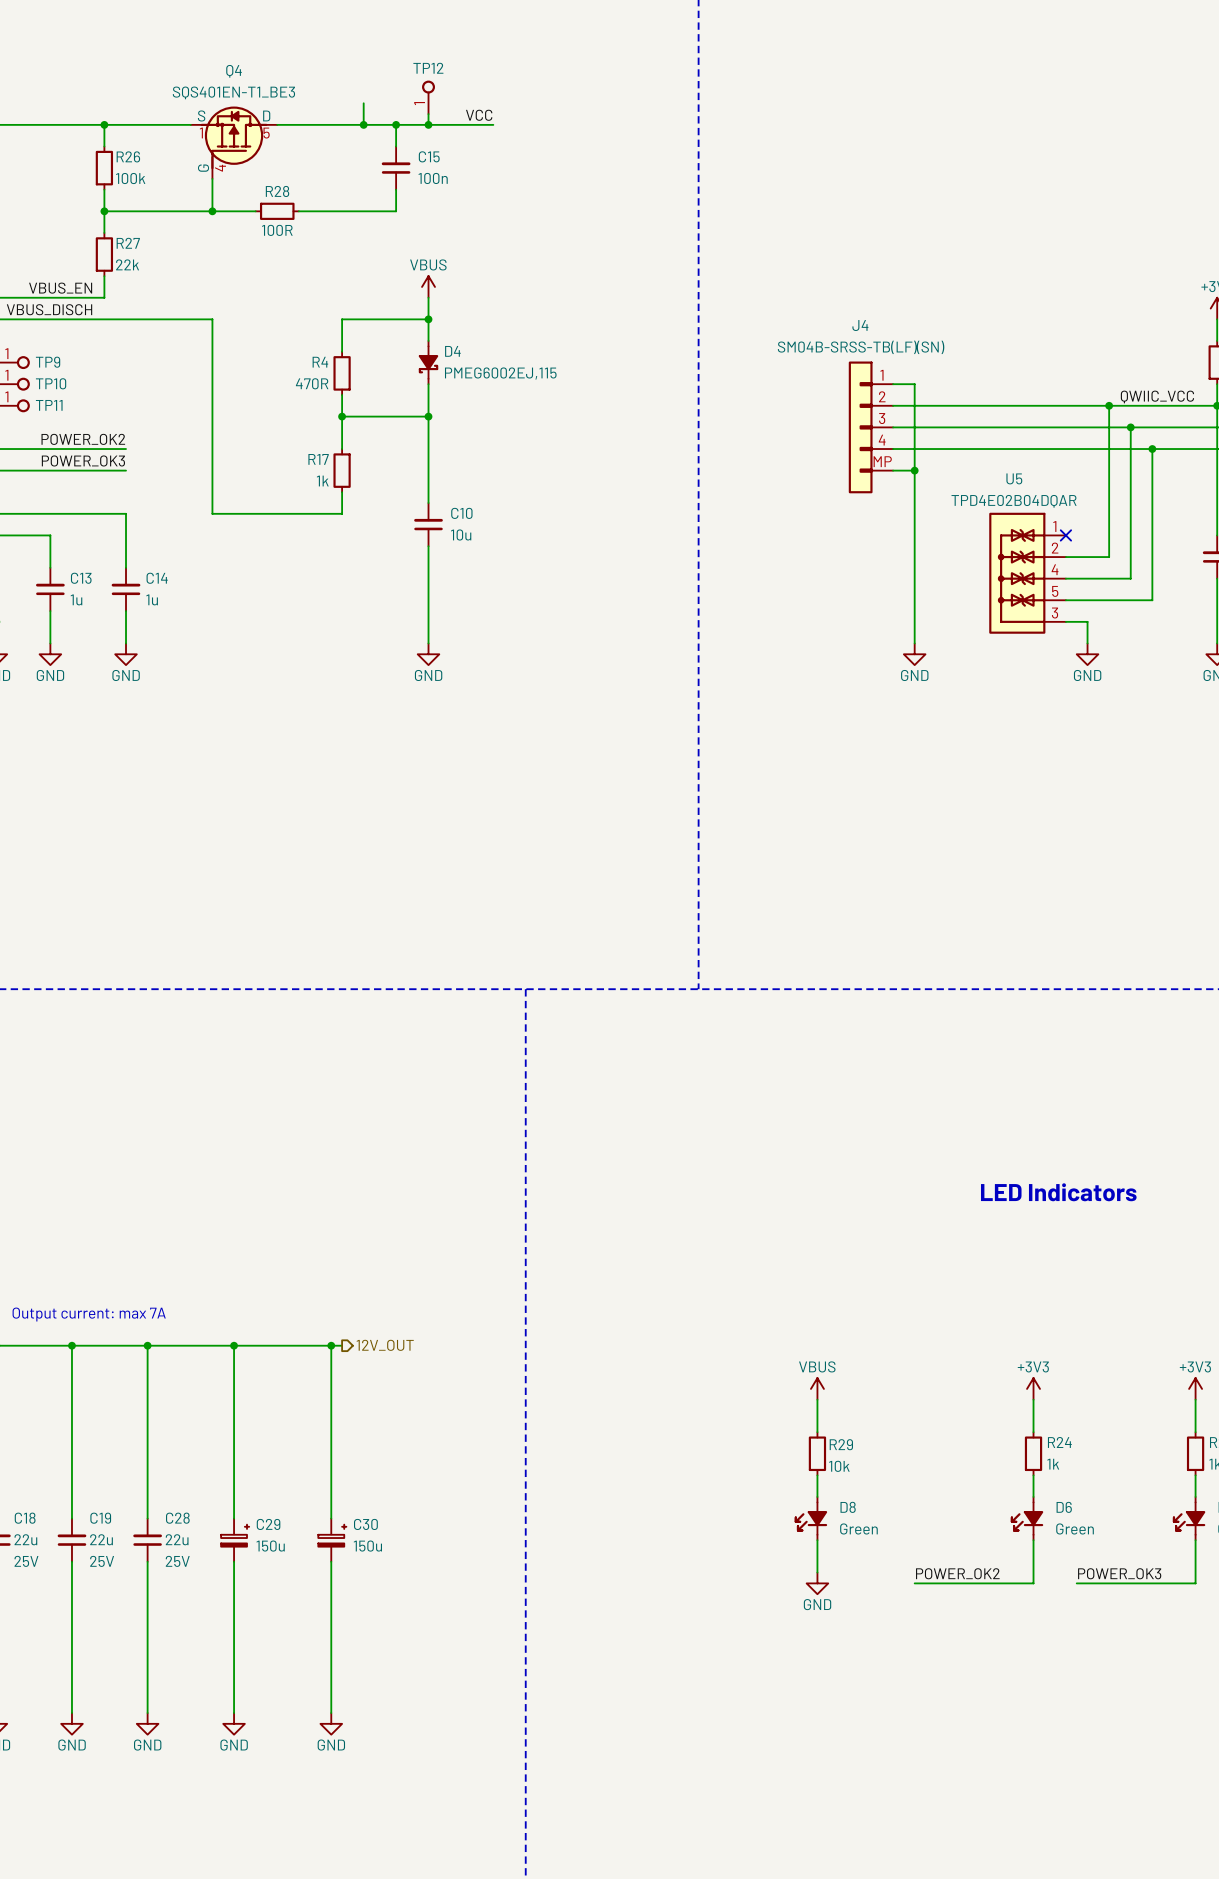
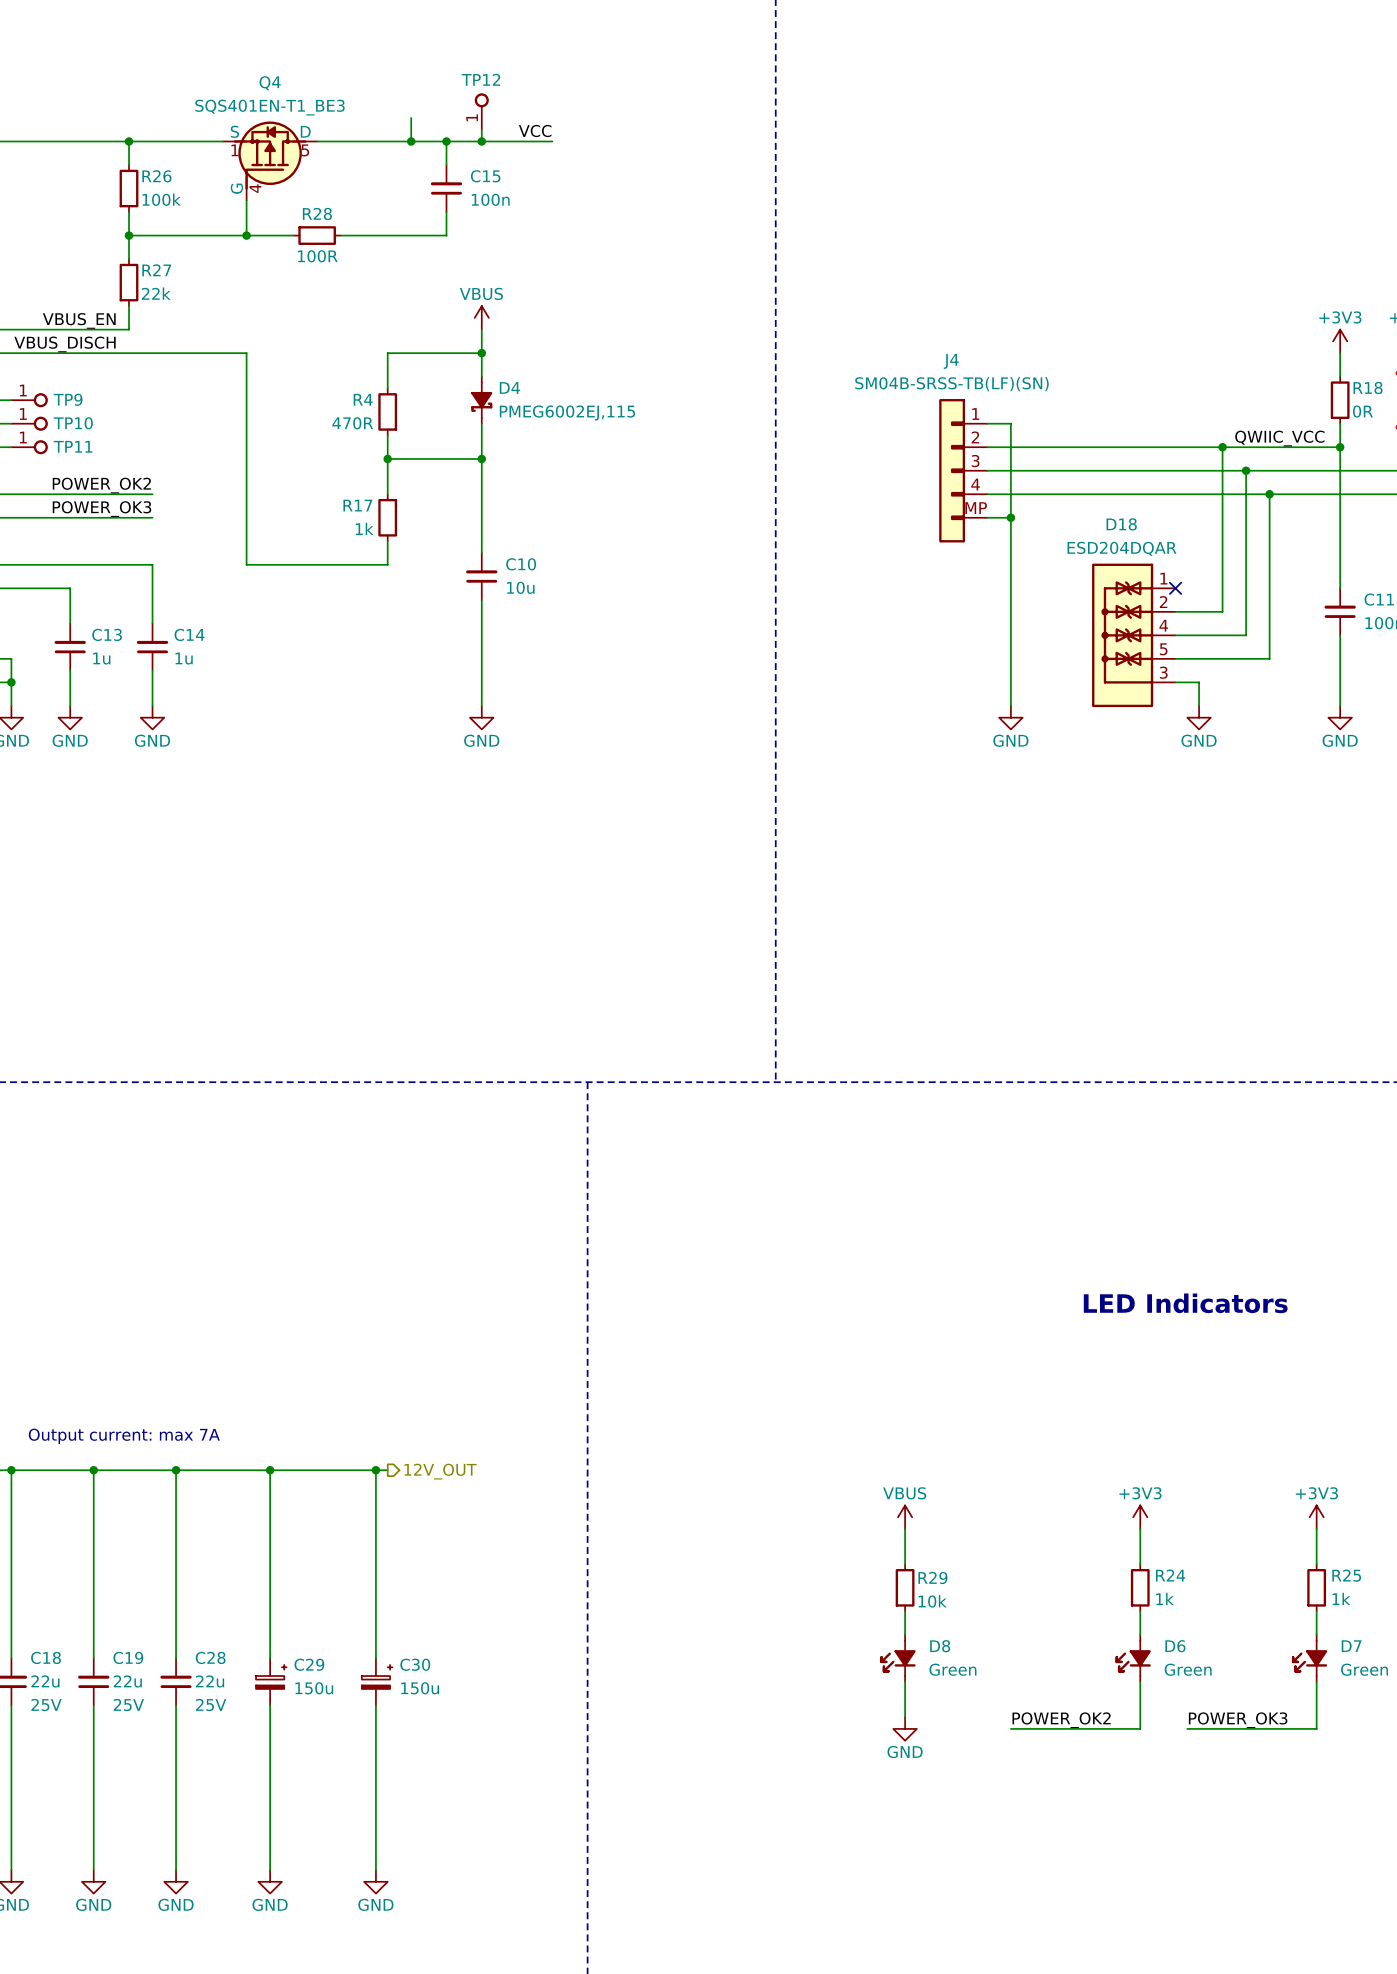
U5: (1027, 573) -> none
D18: none -> (1133, 635)

